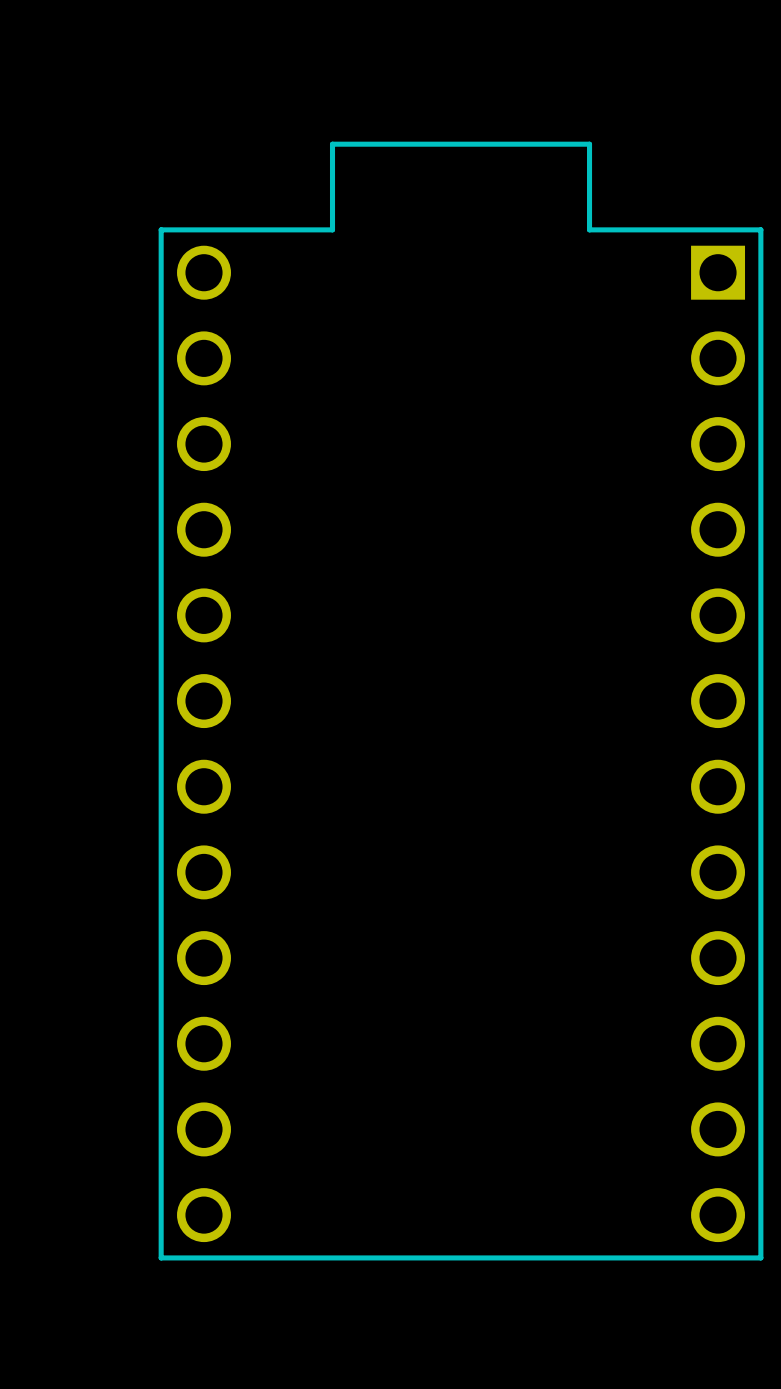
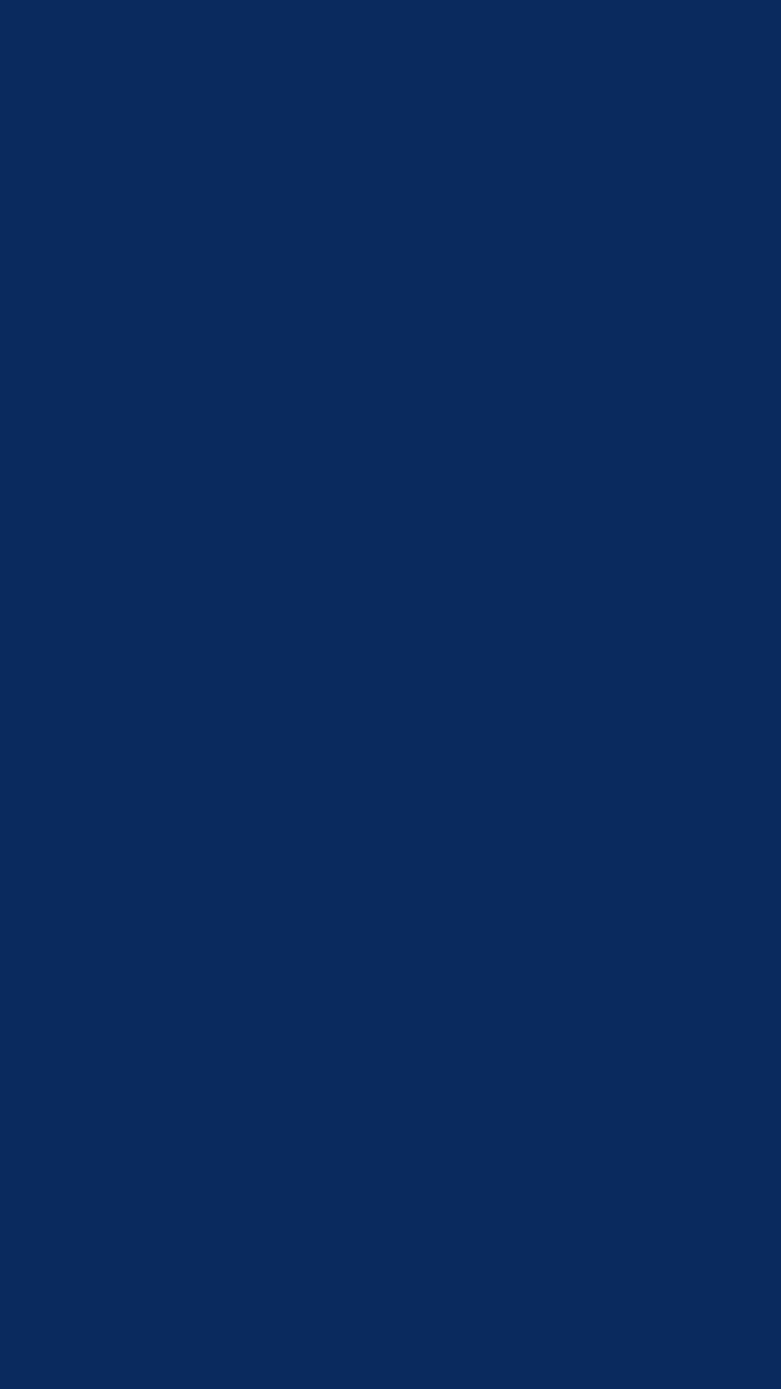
part: (461, 701) -> none

